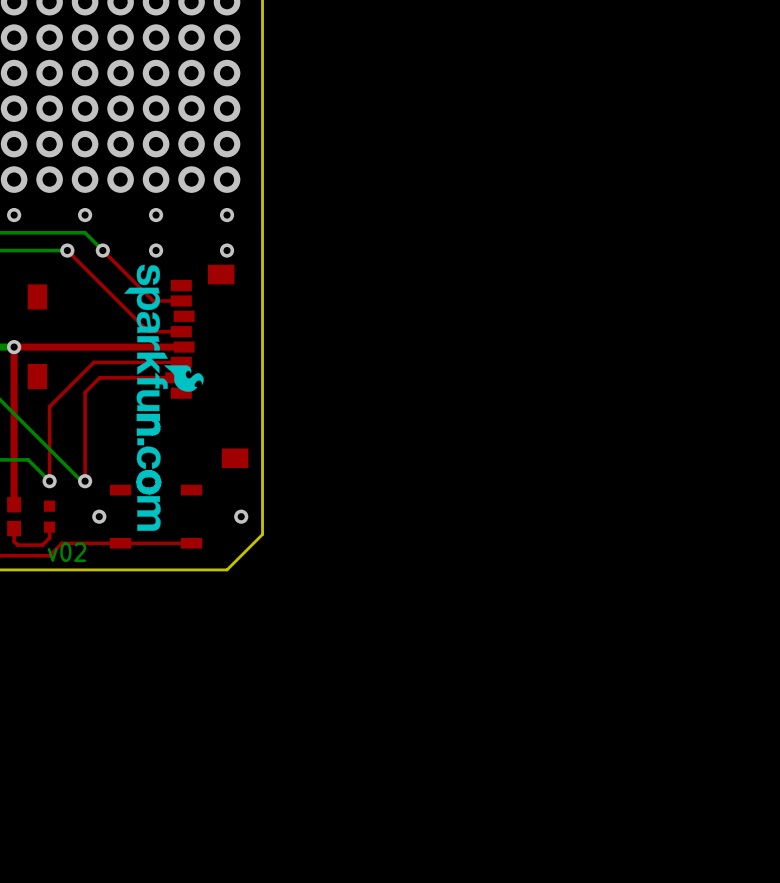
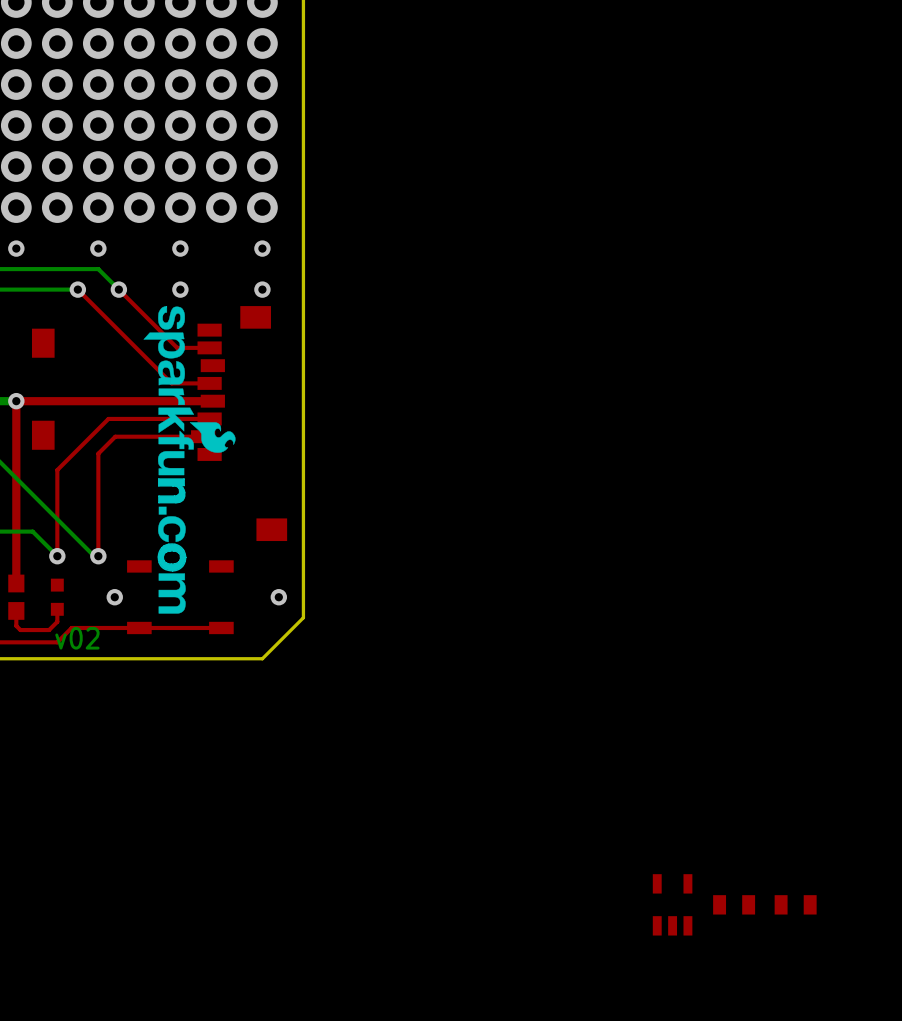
part: none -> (672, 904)
part: none -> (734, 904)
part: none -> (795, 904)

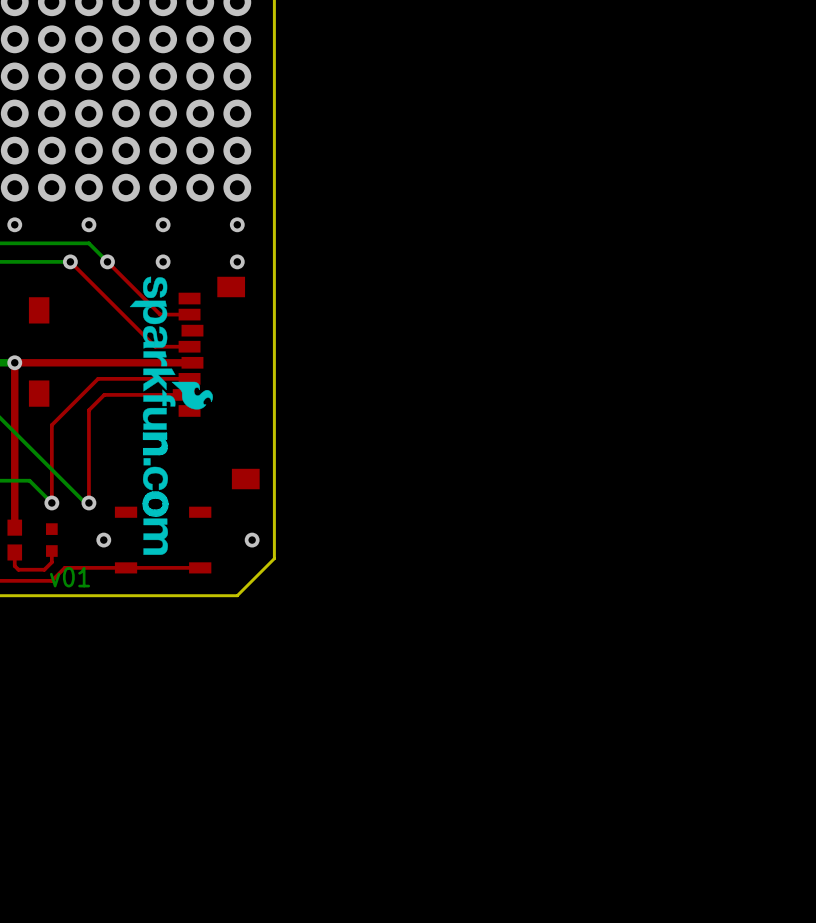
text: v02 (77, 638) -> v01 (70, 577)
part: (672, 904) -> none
part: (734, 904) -> none
part: (795, 904) -> none

